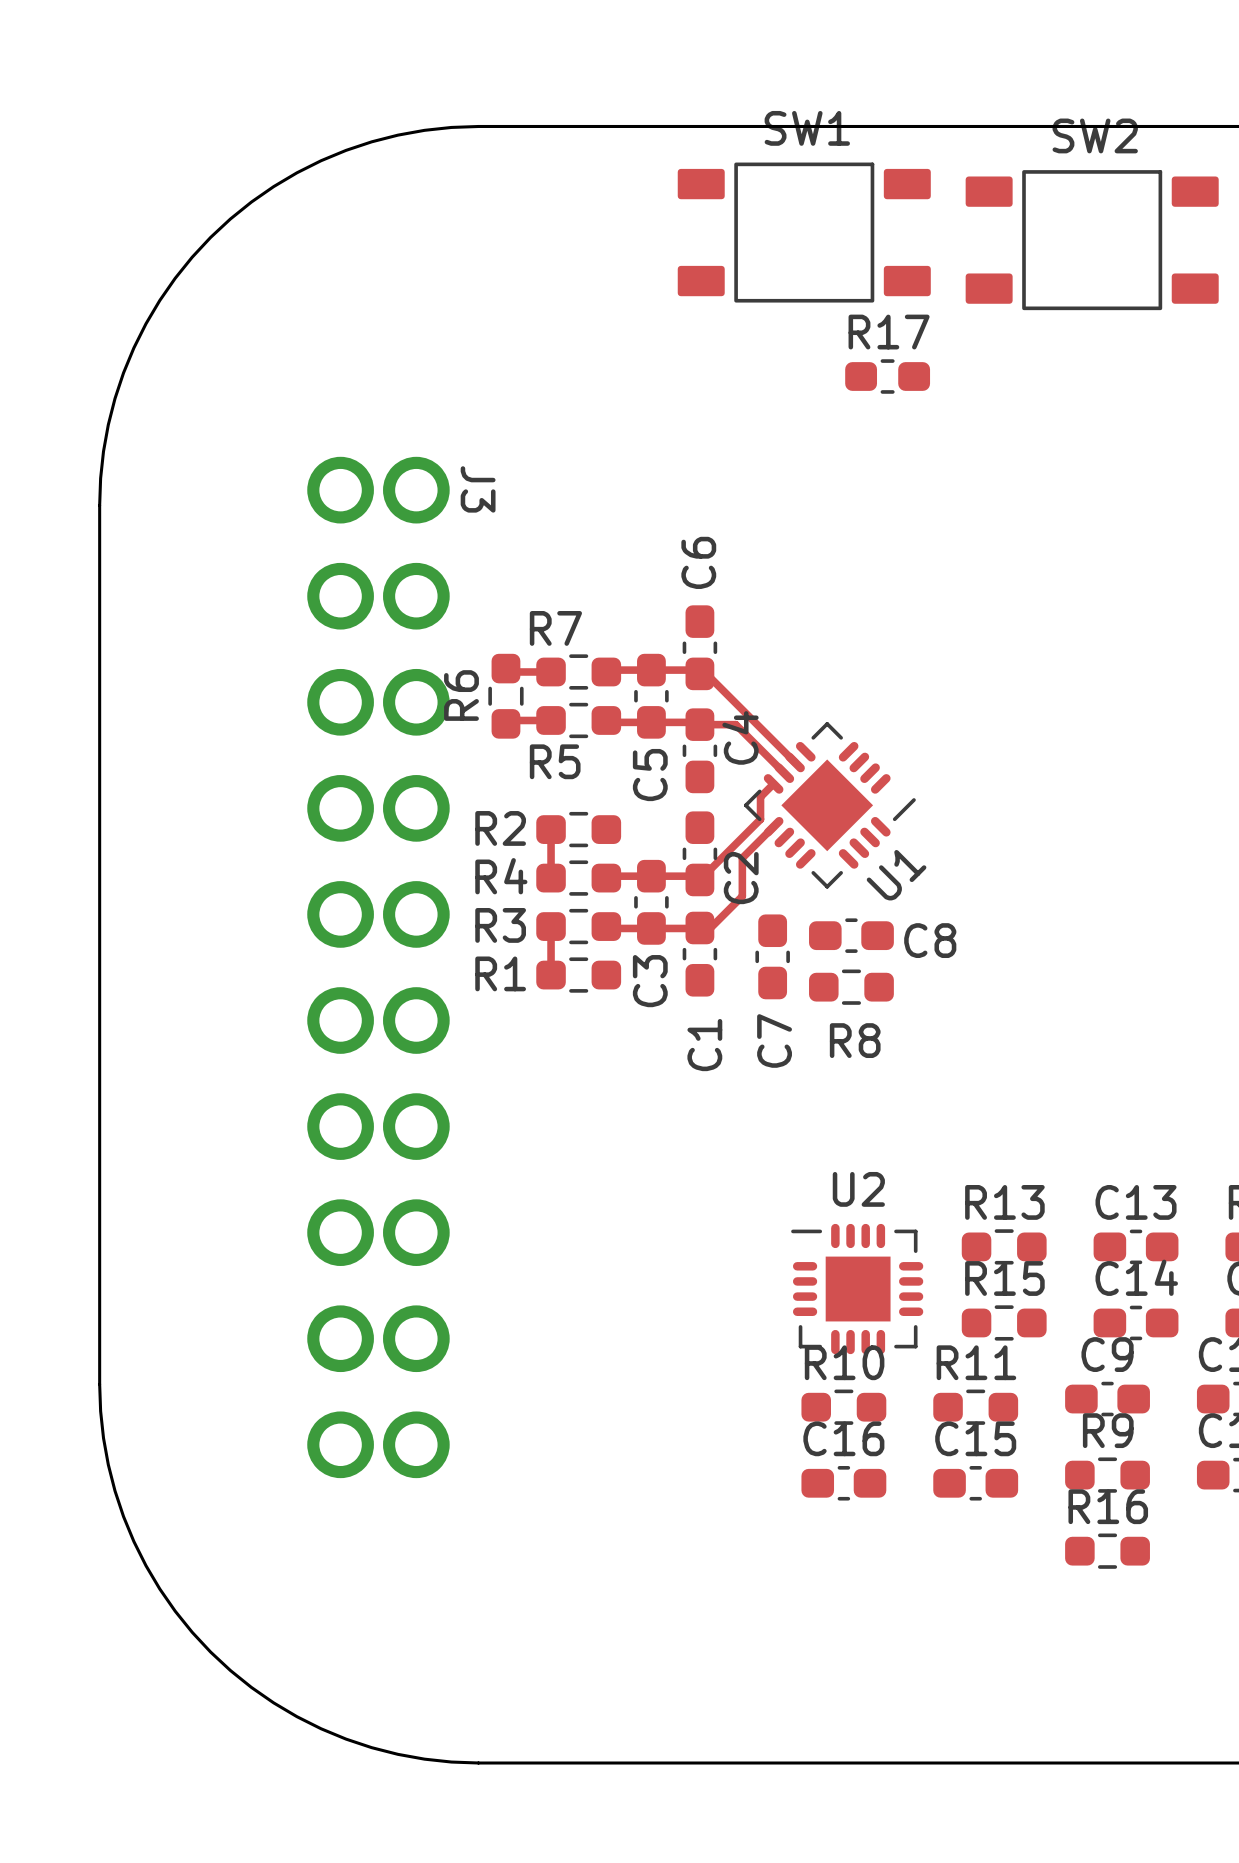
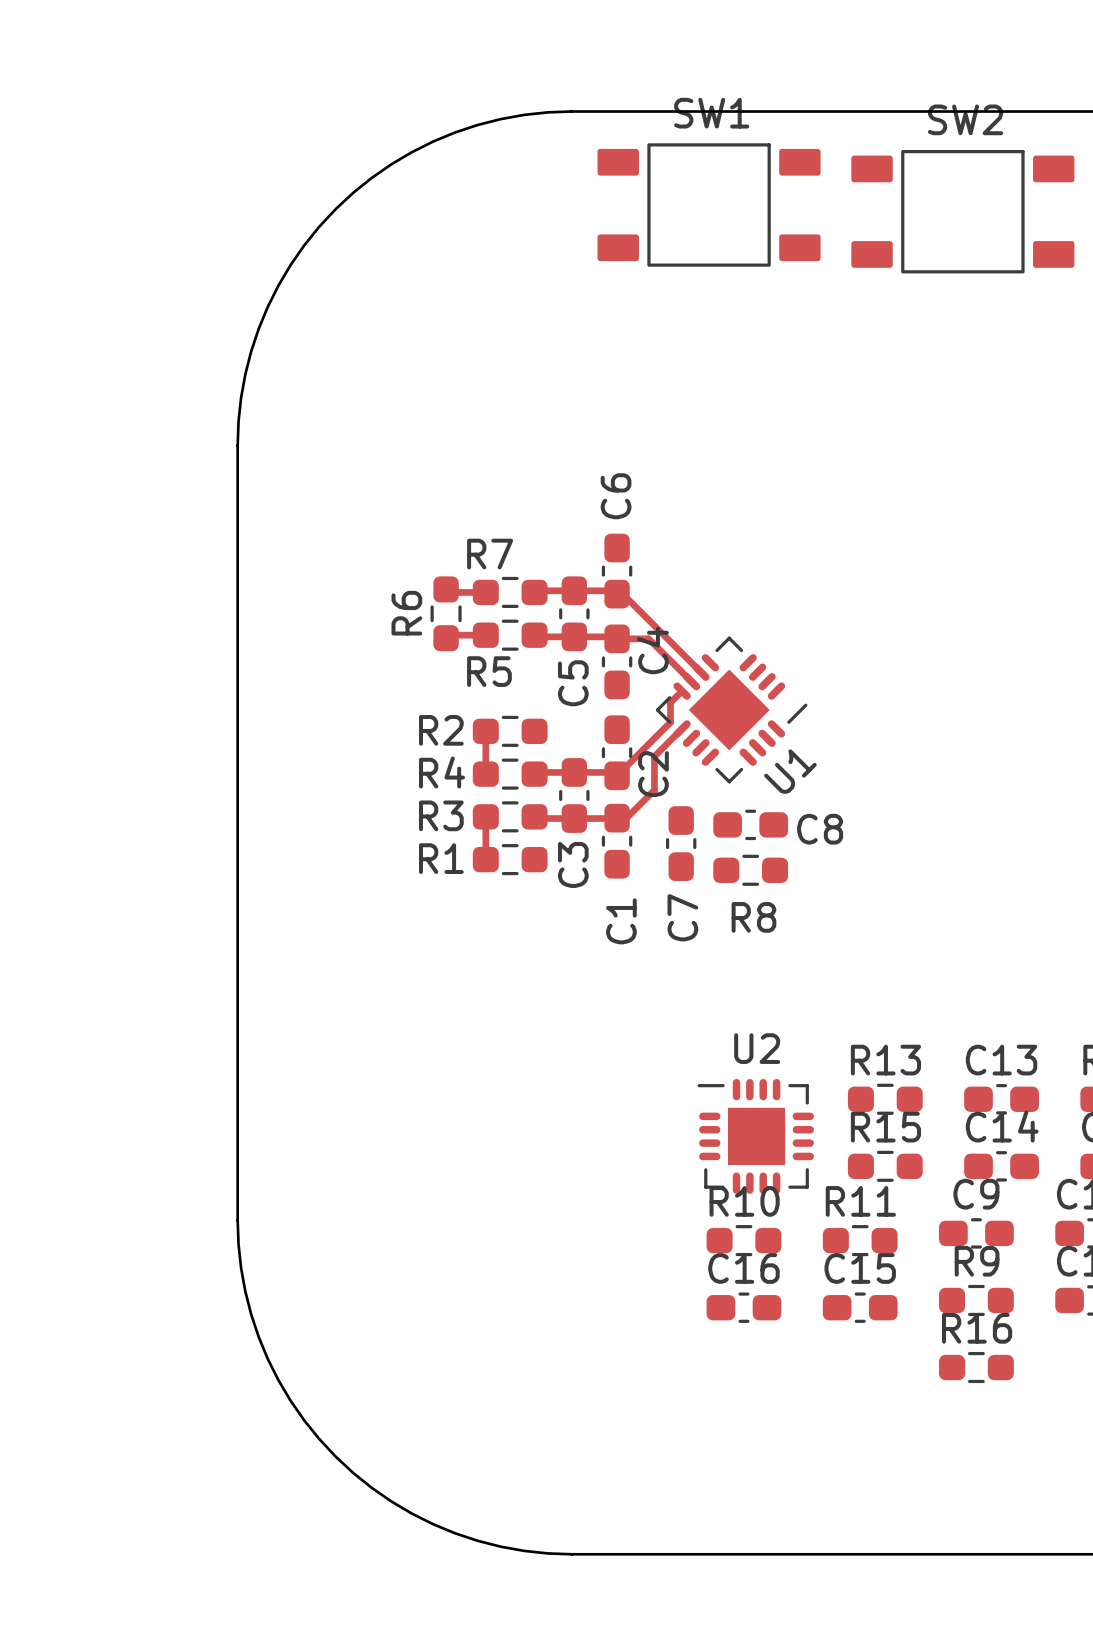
board edge: (648, 126) (478, 126) (424, 130) (371, 141) (346, 150) (296, 172) (273, 186) (230, 219) (192, 257) (175, 278) (146, 323) (123, 372) (115, 398) (103, 451) (99, 505) (99, 1384) (100, 1411) (108, 1464) (115, 1490) (133, 1541) (159, 1588) (175, 1611) (210, 1652) (251, 1687) (273, 1702) (321, 1728) (371, 1747) (424, 1759) (451, 1762) (648, 1763) -> (571, 111) (524, 114) (500, 119) (477, 125) (432, 141) (411, 152) (371, 178) (335, 209) (304, 245) (278, 285) (267, 306) (251, 351) (245, 374) (241, 397) (237, 445) (237, 1220) (241, 1267) (251, 1314) (267, 1359) (278, 1380) (304, 1420) (335, 1456) (371, 1487) (411, 1513) (454, 1533) (500, 1546) (524, 1550) (571, 1554)
R17: (887, 376) -> none
J3: (378, 967) -> none

